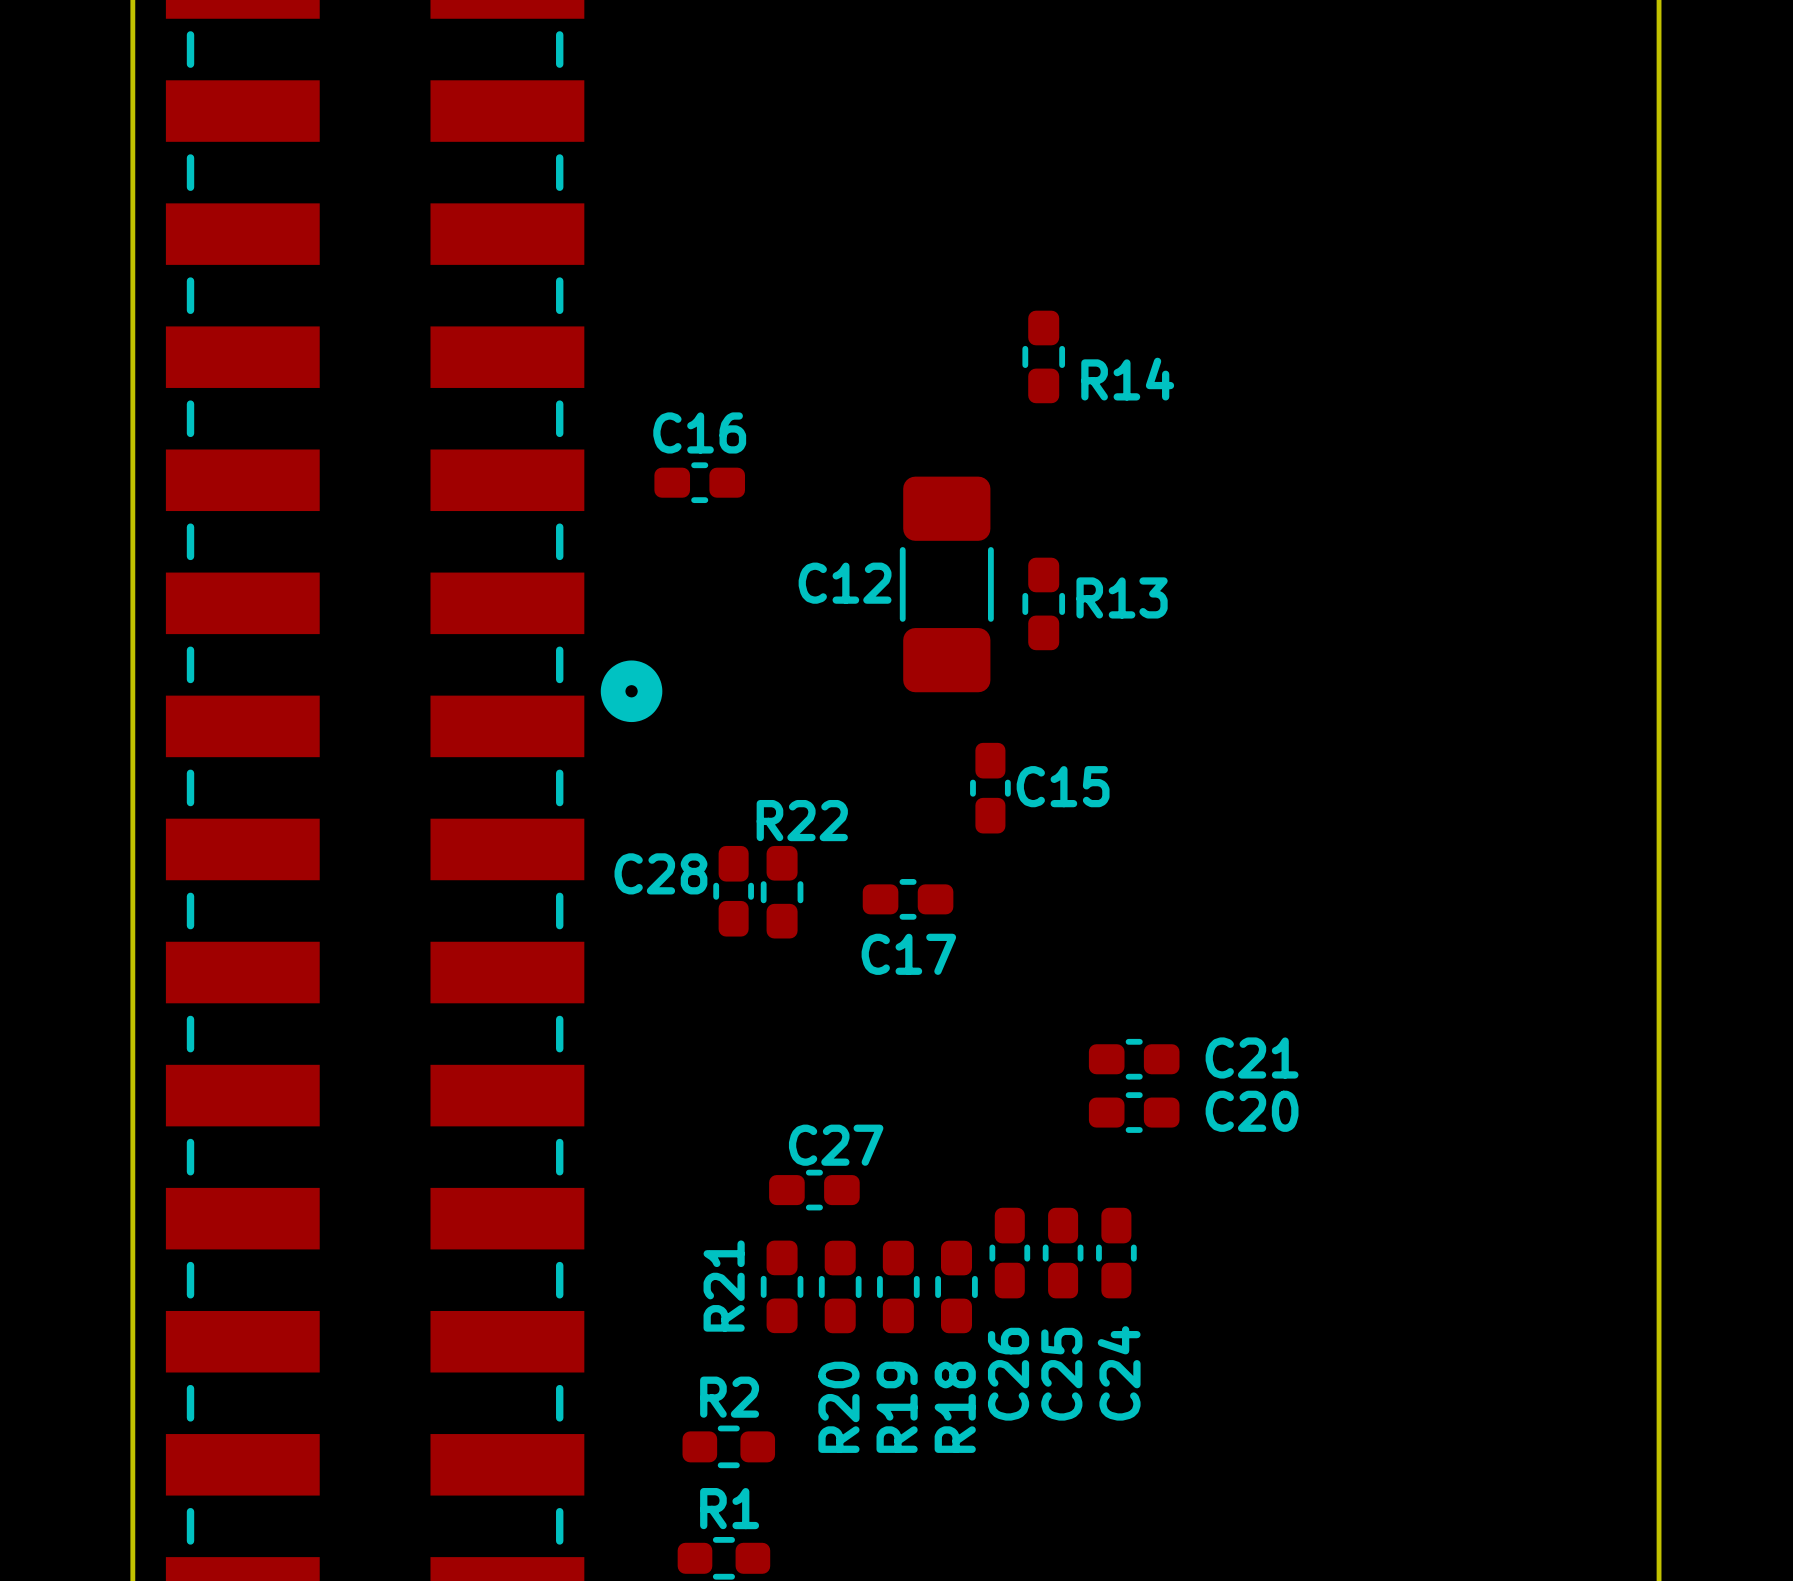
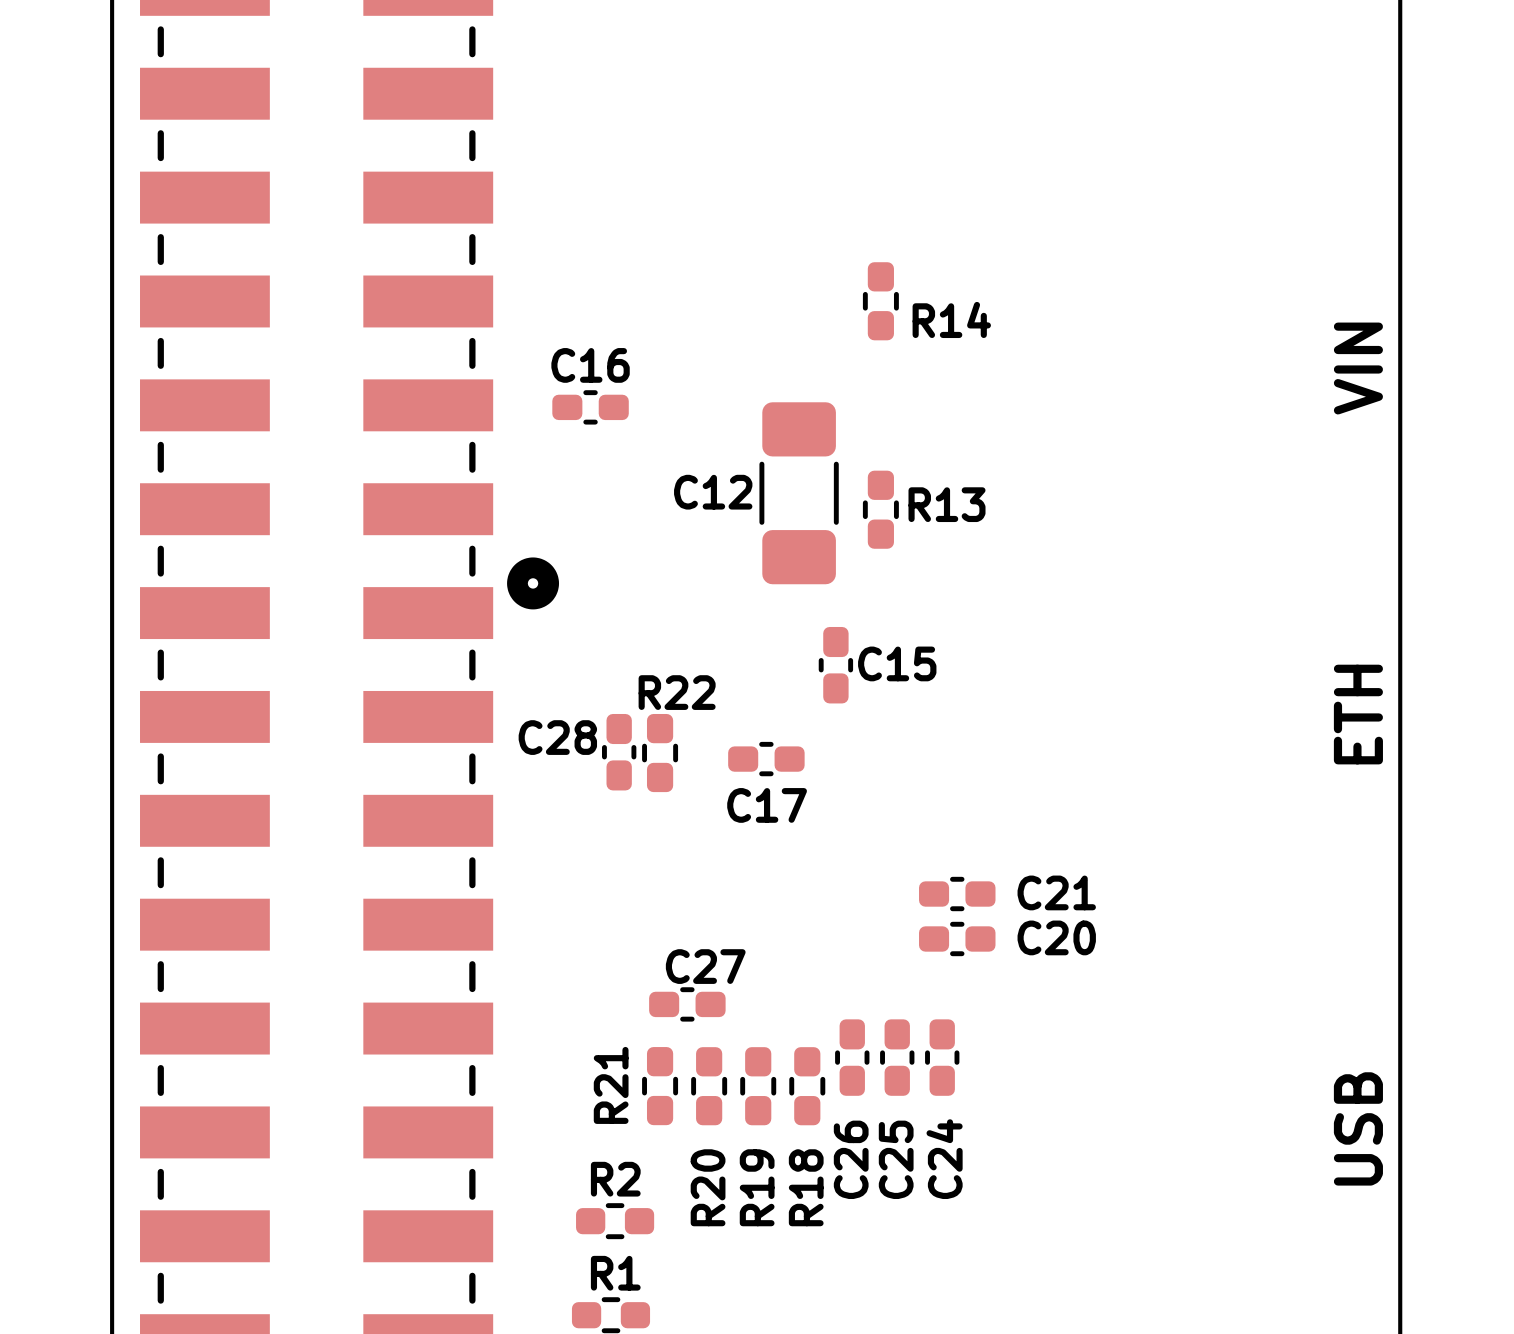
text: none -> VIN (1358, 368)
text: none -> ETH (1358, 714)
text: none -> USB (1358, 1128)

